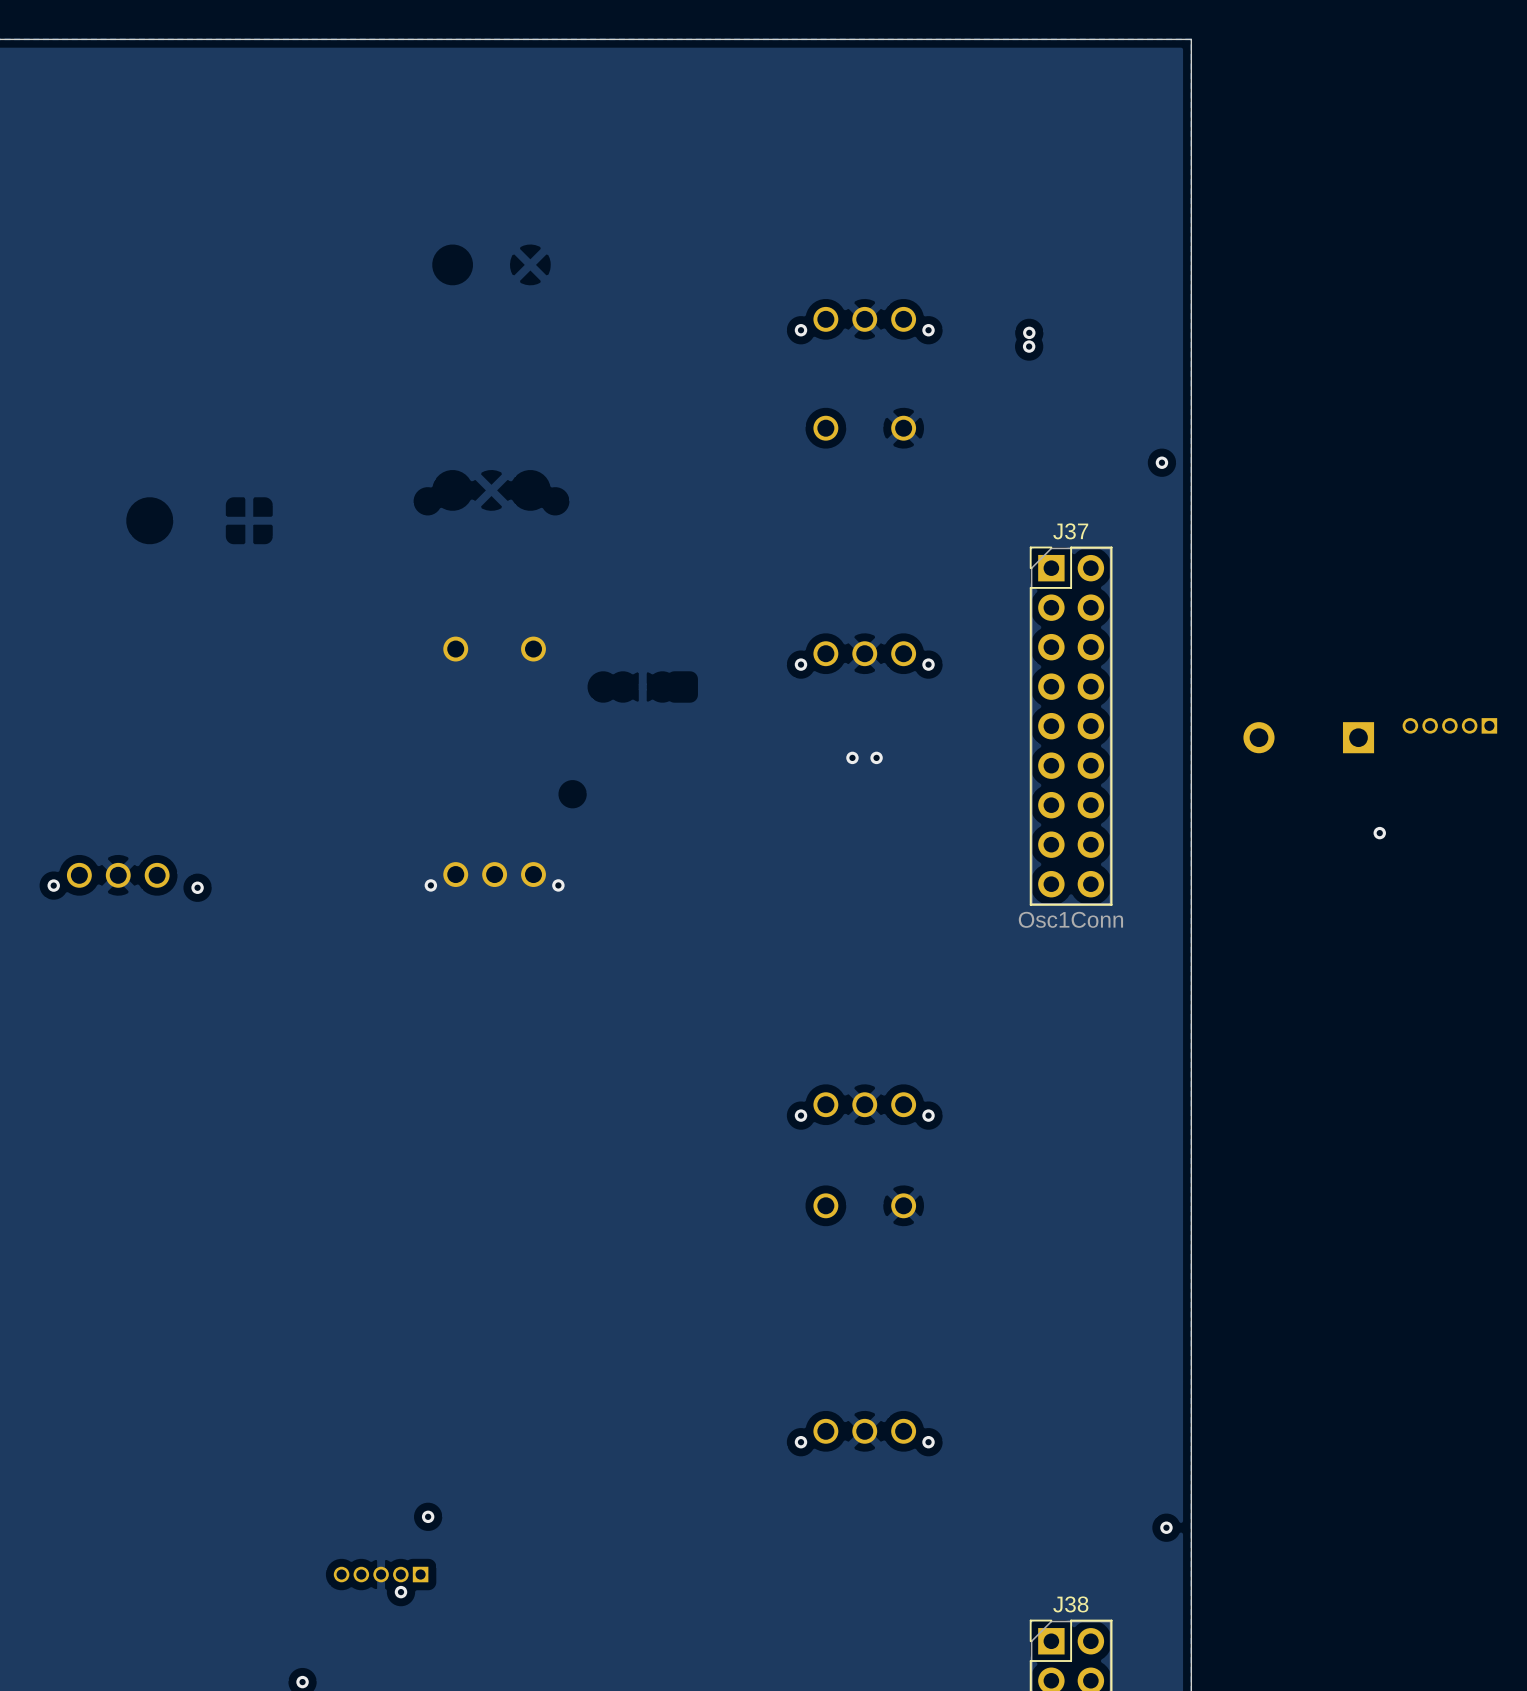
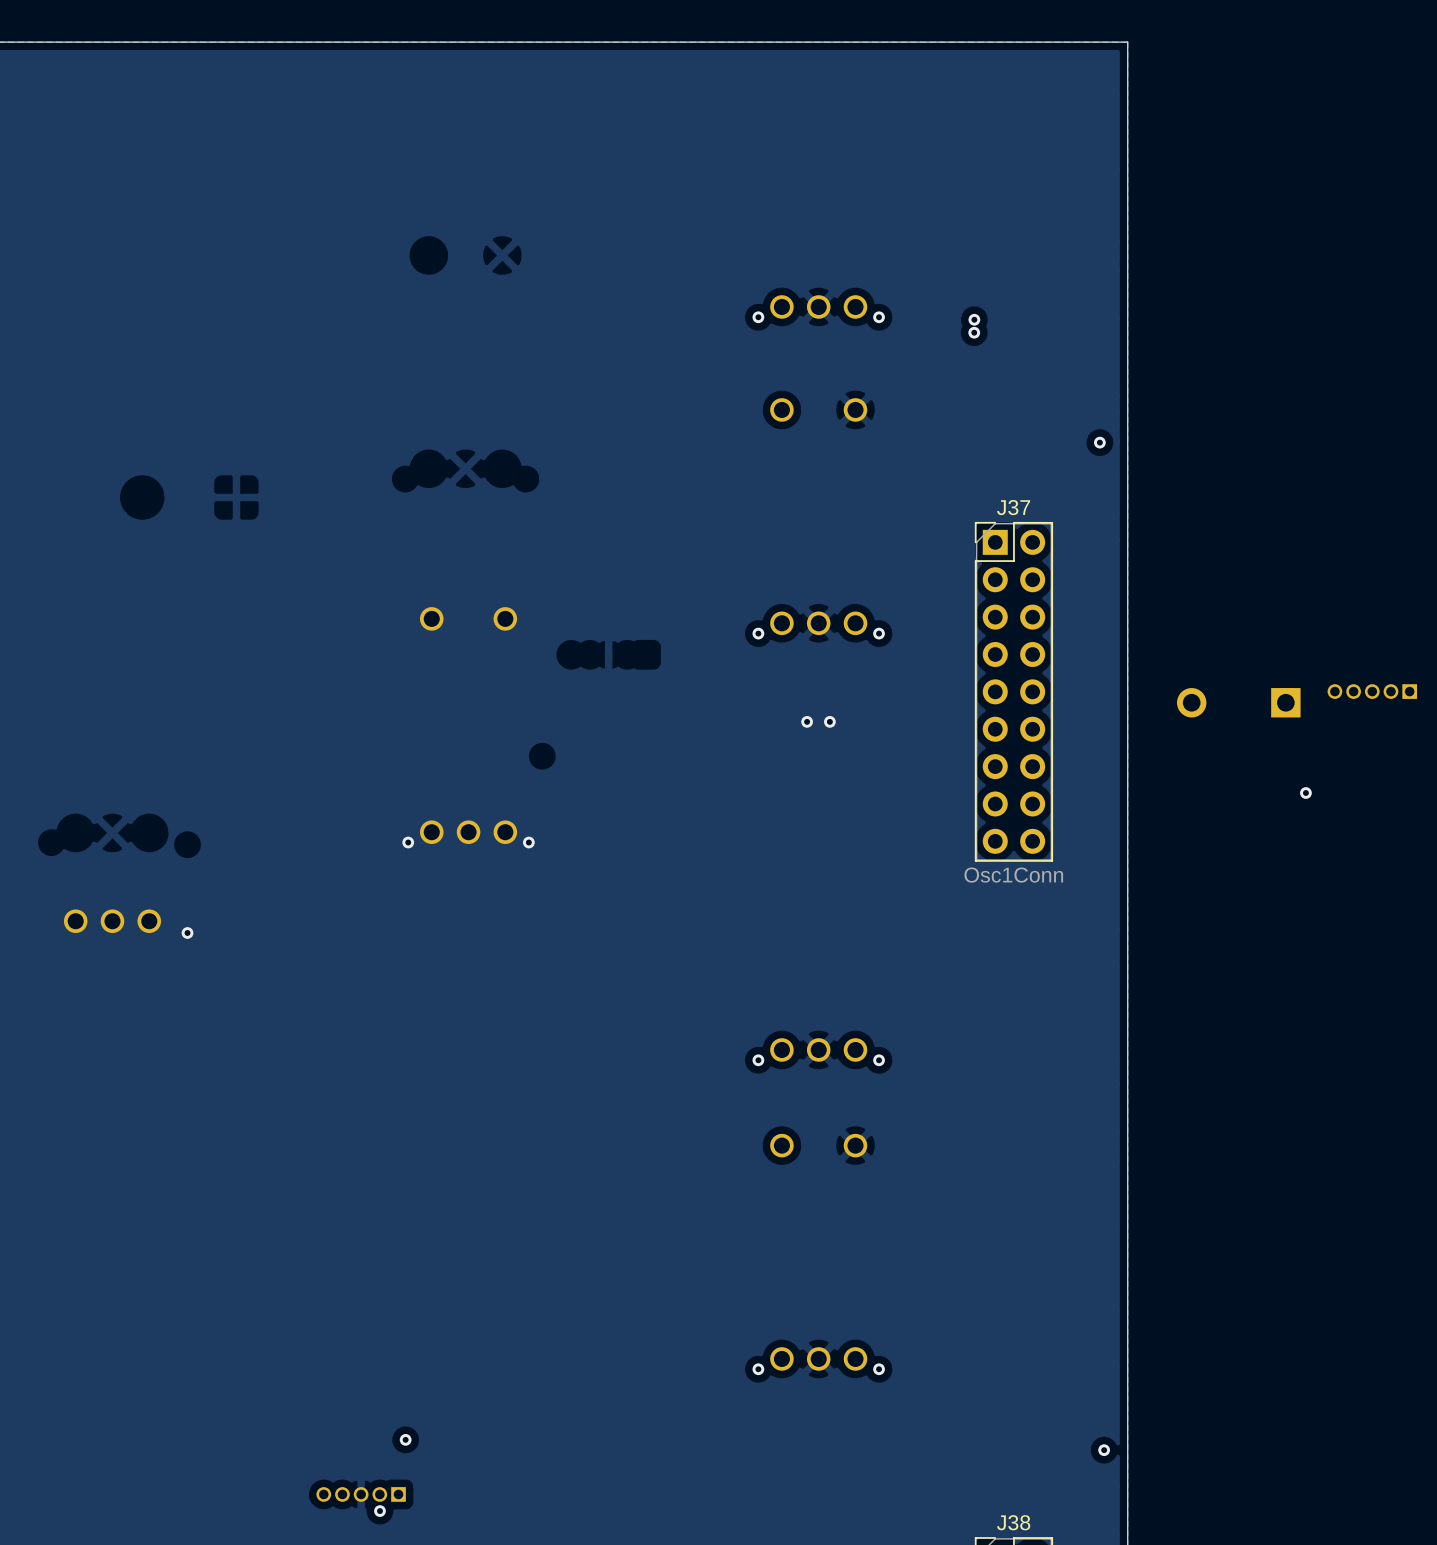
part position: (118, 875) -> (112, 921)
via: (53, 885) -> none
via: (197, 887) -> none
via: none -> (187, 933)

